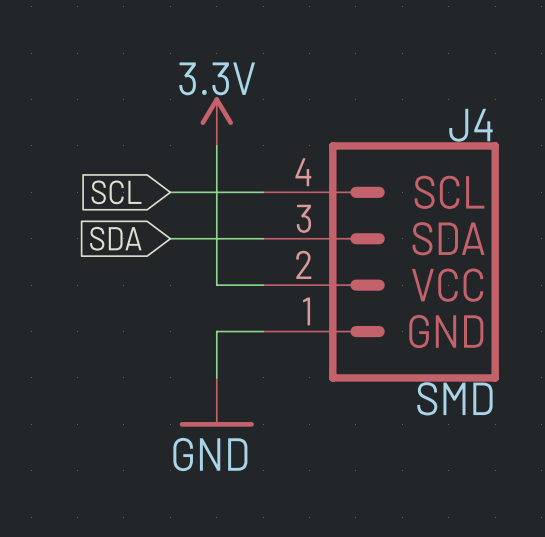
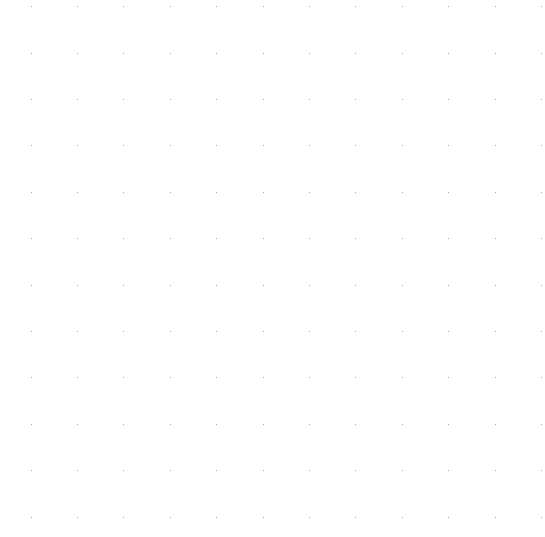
power symbol: 3.3V (216, 121) -> none
wire: (216, 145) (216, 285) (263, 285) -> none
global label: SCL (116, 192) -> none
wire: (170, 192) (263, 192) -> none
global label: SDA (115, 238) -> none
wire: (170, 238) (263, 238) -> none
J4: SMD (381, 261) -> none
wire: (263, 331) (216, 331) (216, 377) -> none
power symbol: GND (216, 402) -> none

